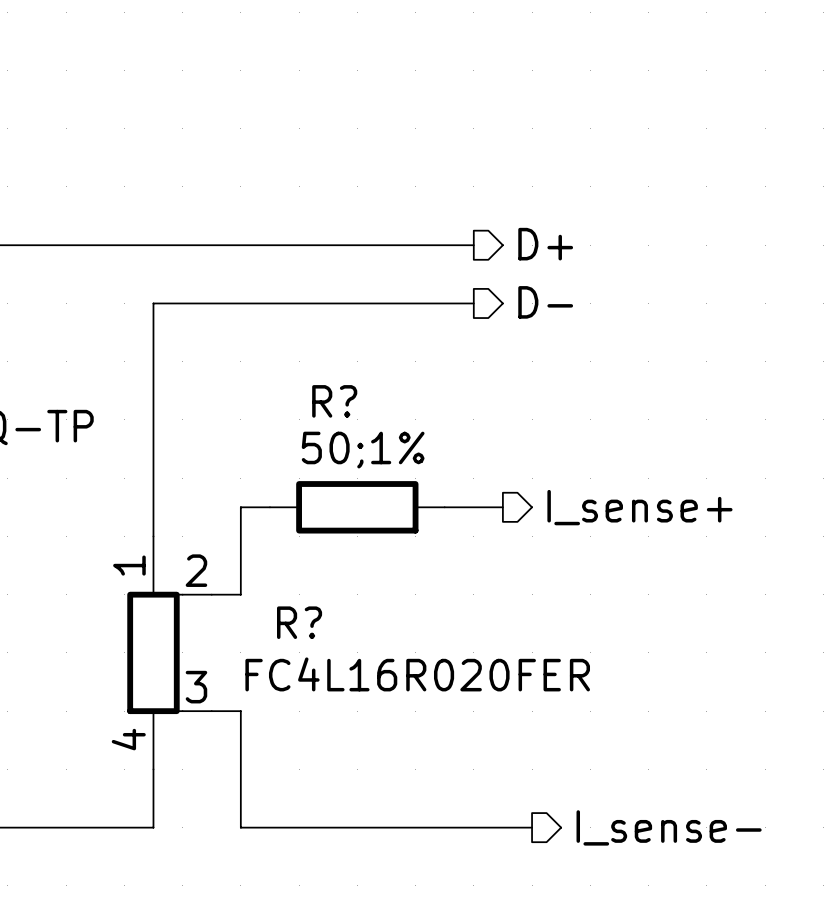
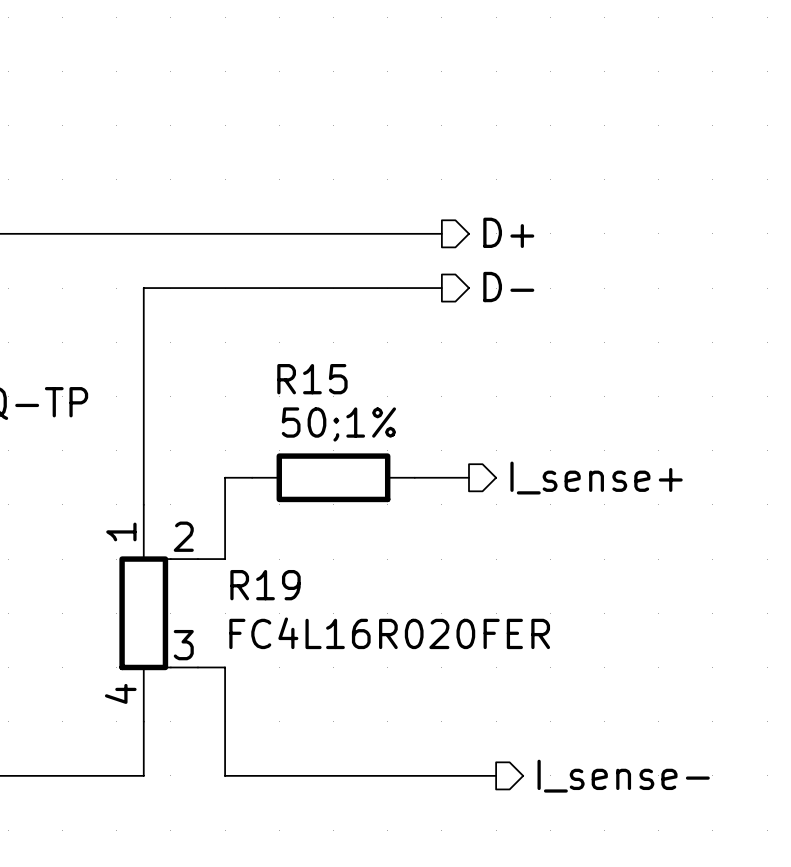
R? name: R? (334, 401) -> R15 (312, 379)
R? name: R? (299, 622) -> R19 (265, 585)

